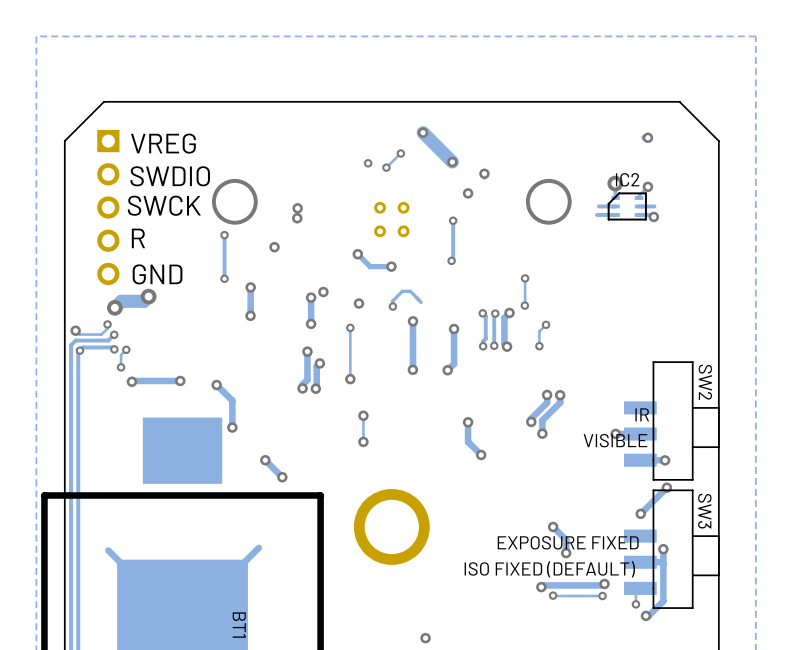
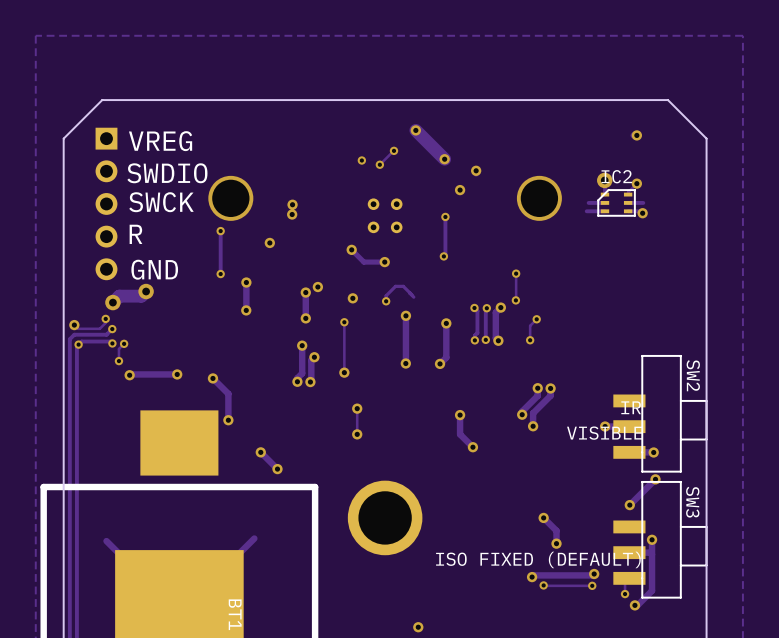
text: EXPOSURE FIXED (568, 542) -> none

